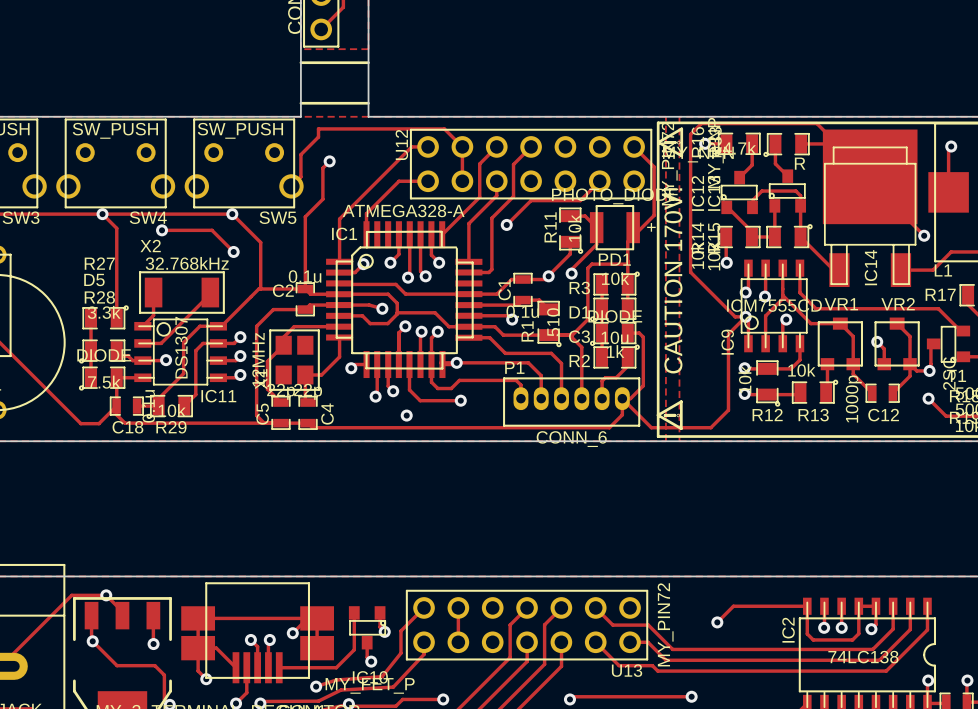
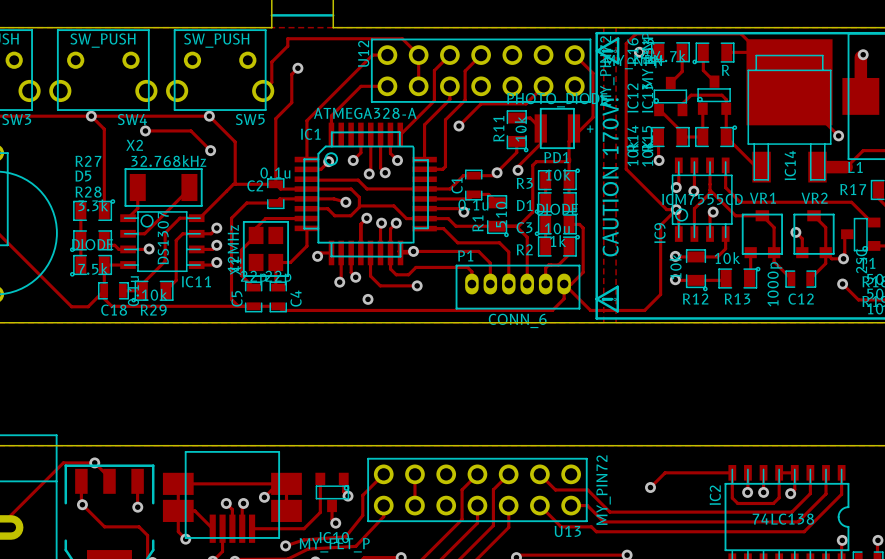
track width: thin (948, 149) (948, 192) -> thick (860, 57) (860, 96)
track width: thin (900, 270) (933, 270) -> thick (817, 167) (846, 167)

